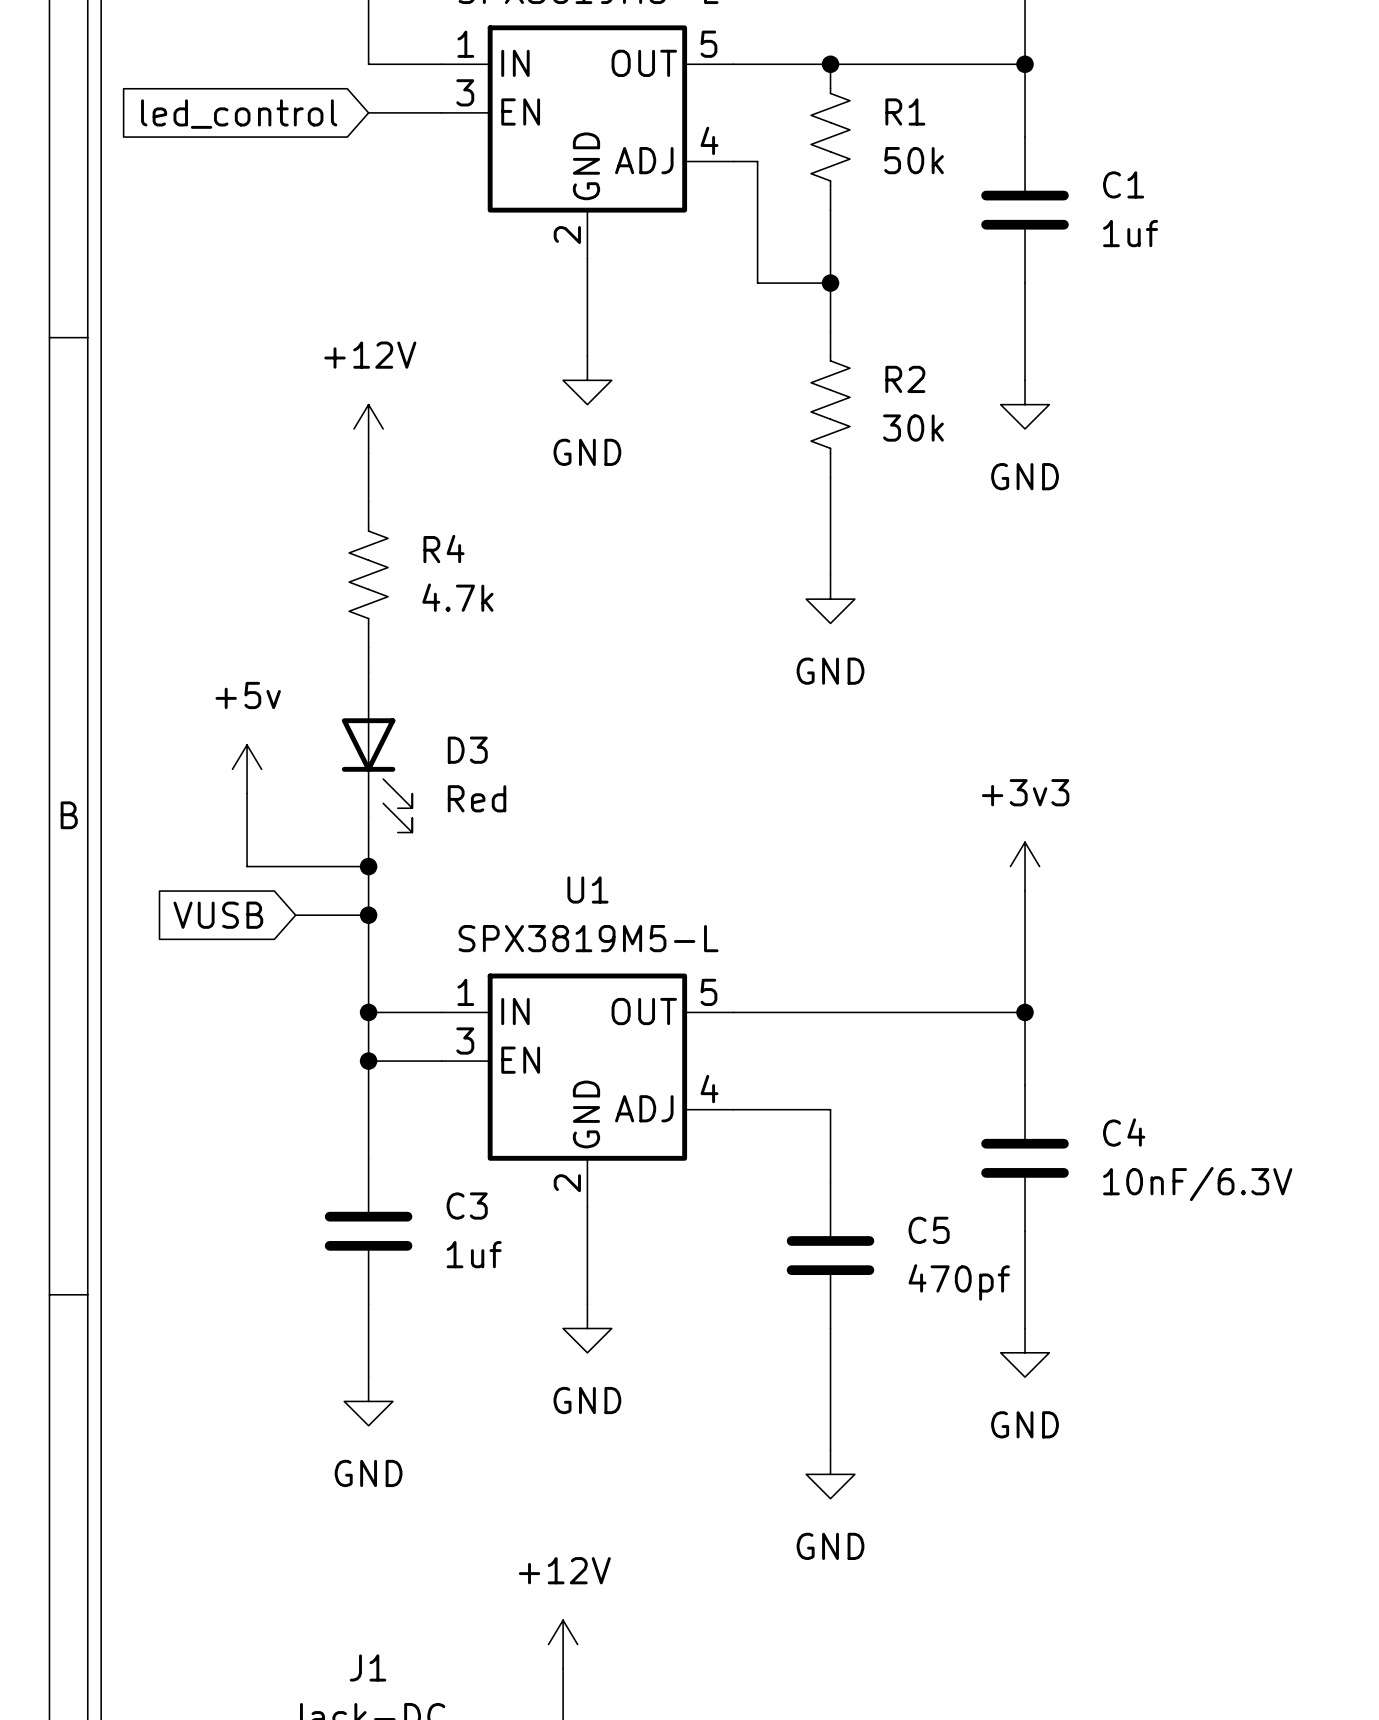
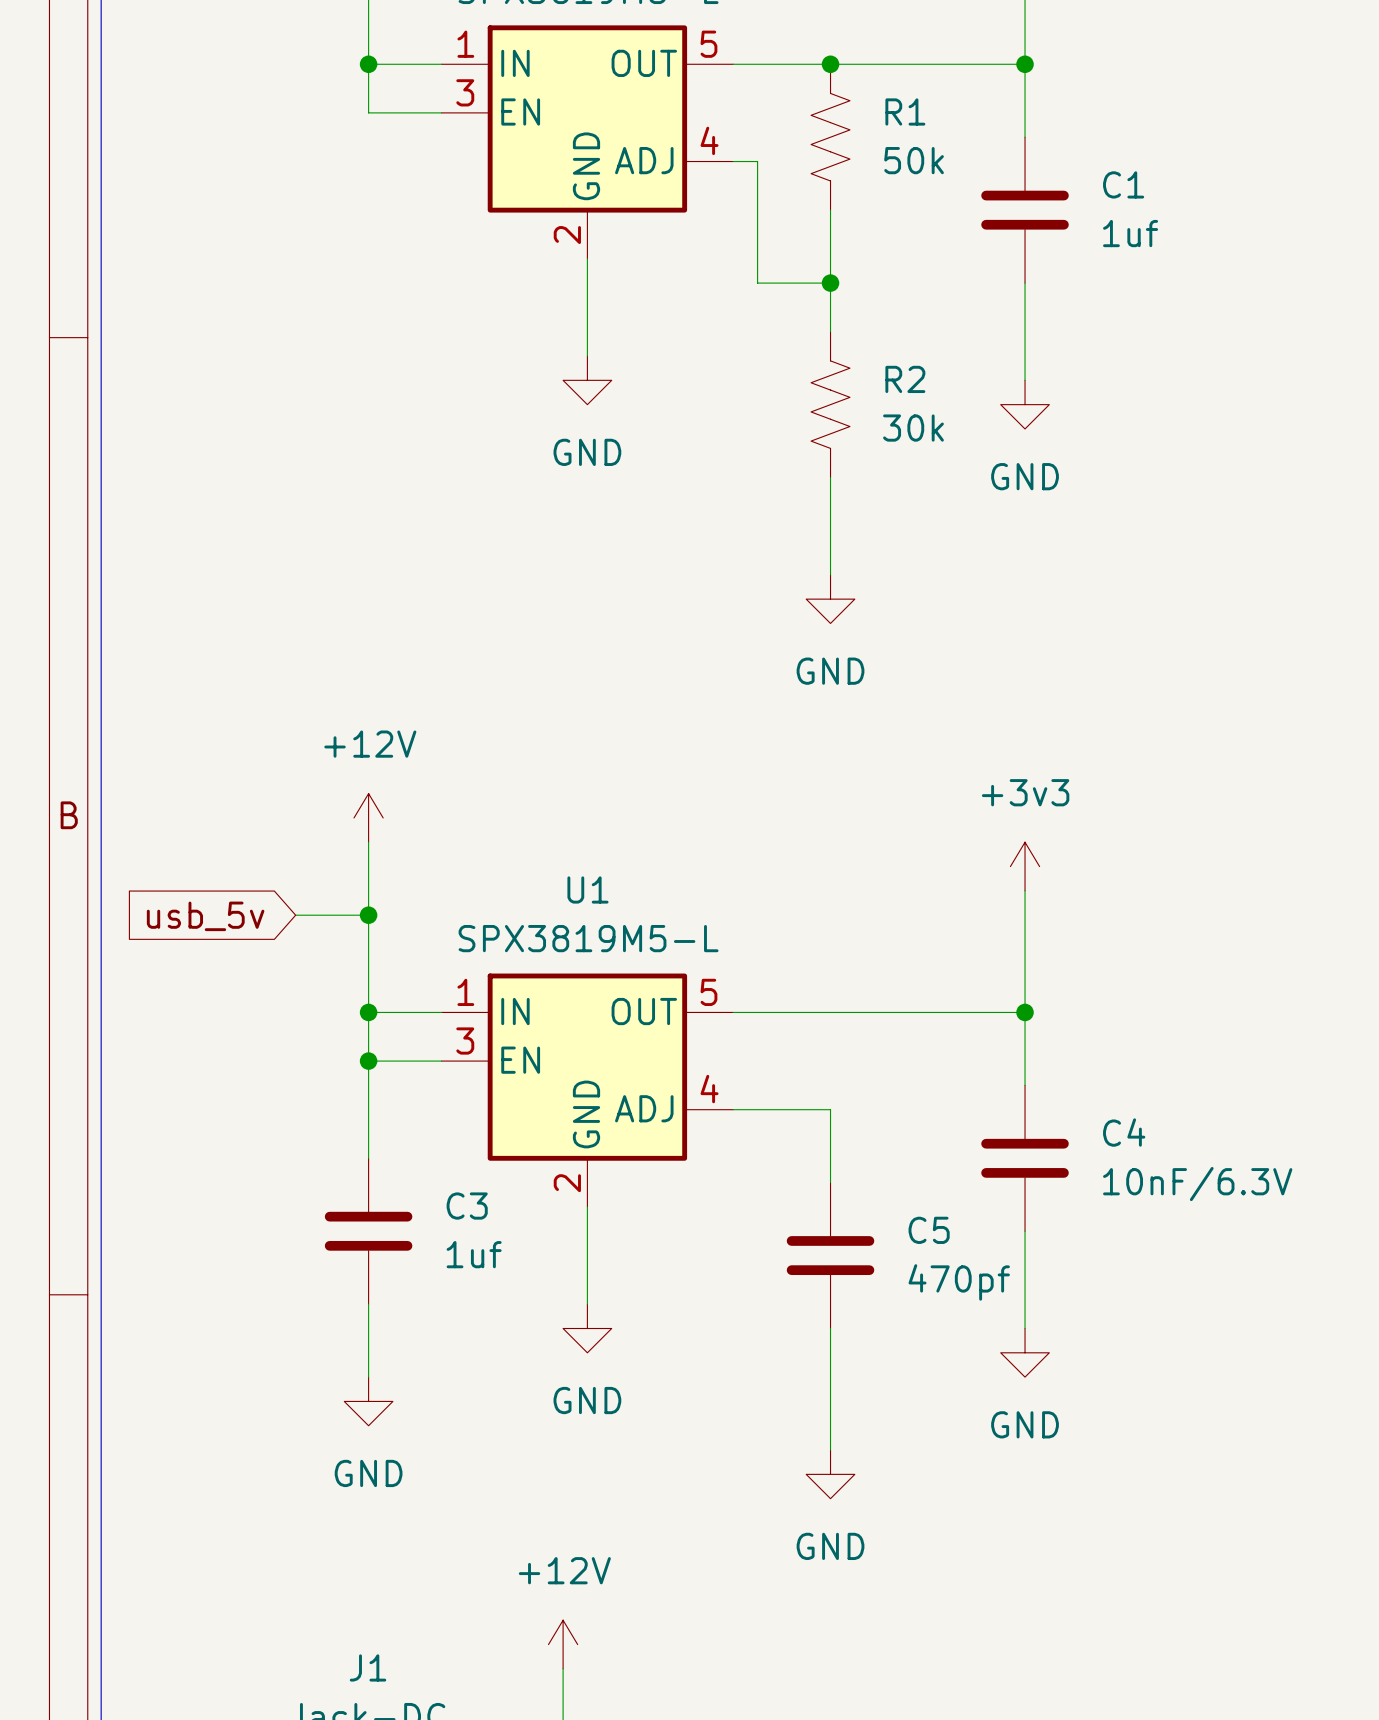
junction: none -> (368, 64)
global label: led_control (239, 114) -> none
power symbol position: +12V (368, 428) -> +12V (368, 817)
wire: (368, 453) (368, 501) -> (368, 64) (368, 112)
R4: 4.7k (368, 574) -> none
wire: (368, 647) (368, 672) -> none
D3: Red (377, 752) -> none
power symbol: +5v (247, 769) -> none
wire: (247, 793) (247, 866) (368, 866) -> none
junction: (368, 866) -> none
global label: VUSB (218, 915) -> usb_5v (205, 916)

